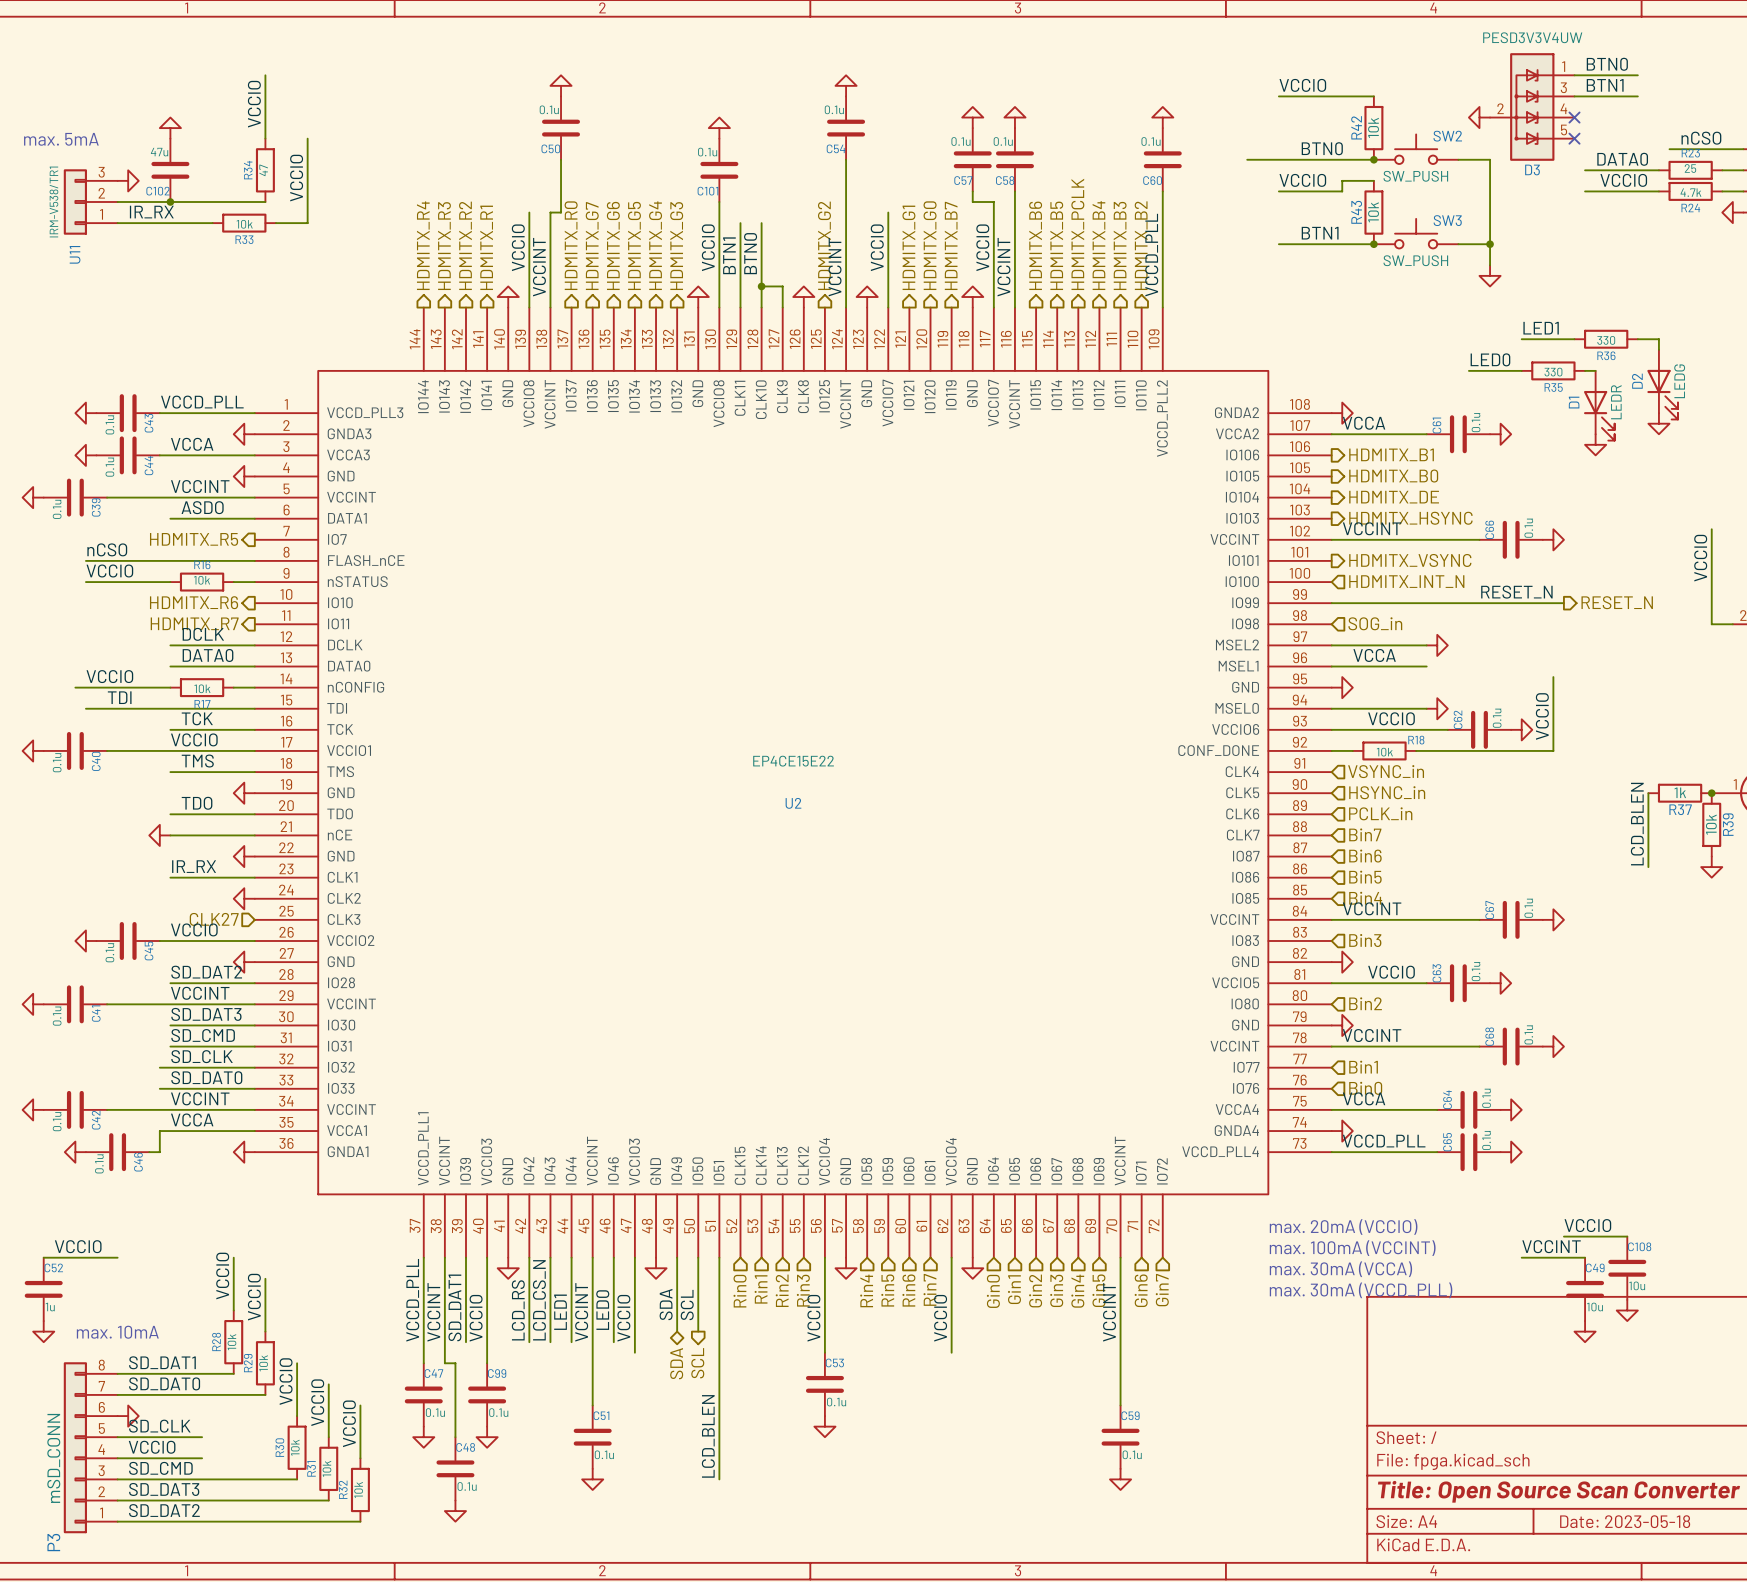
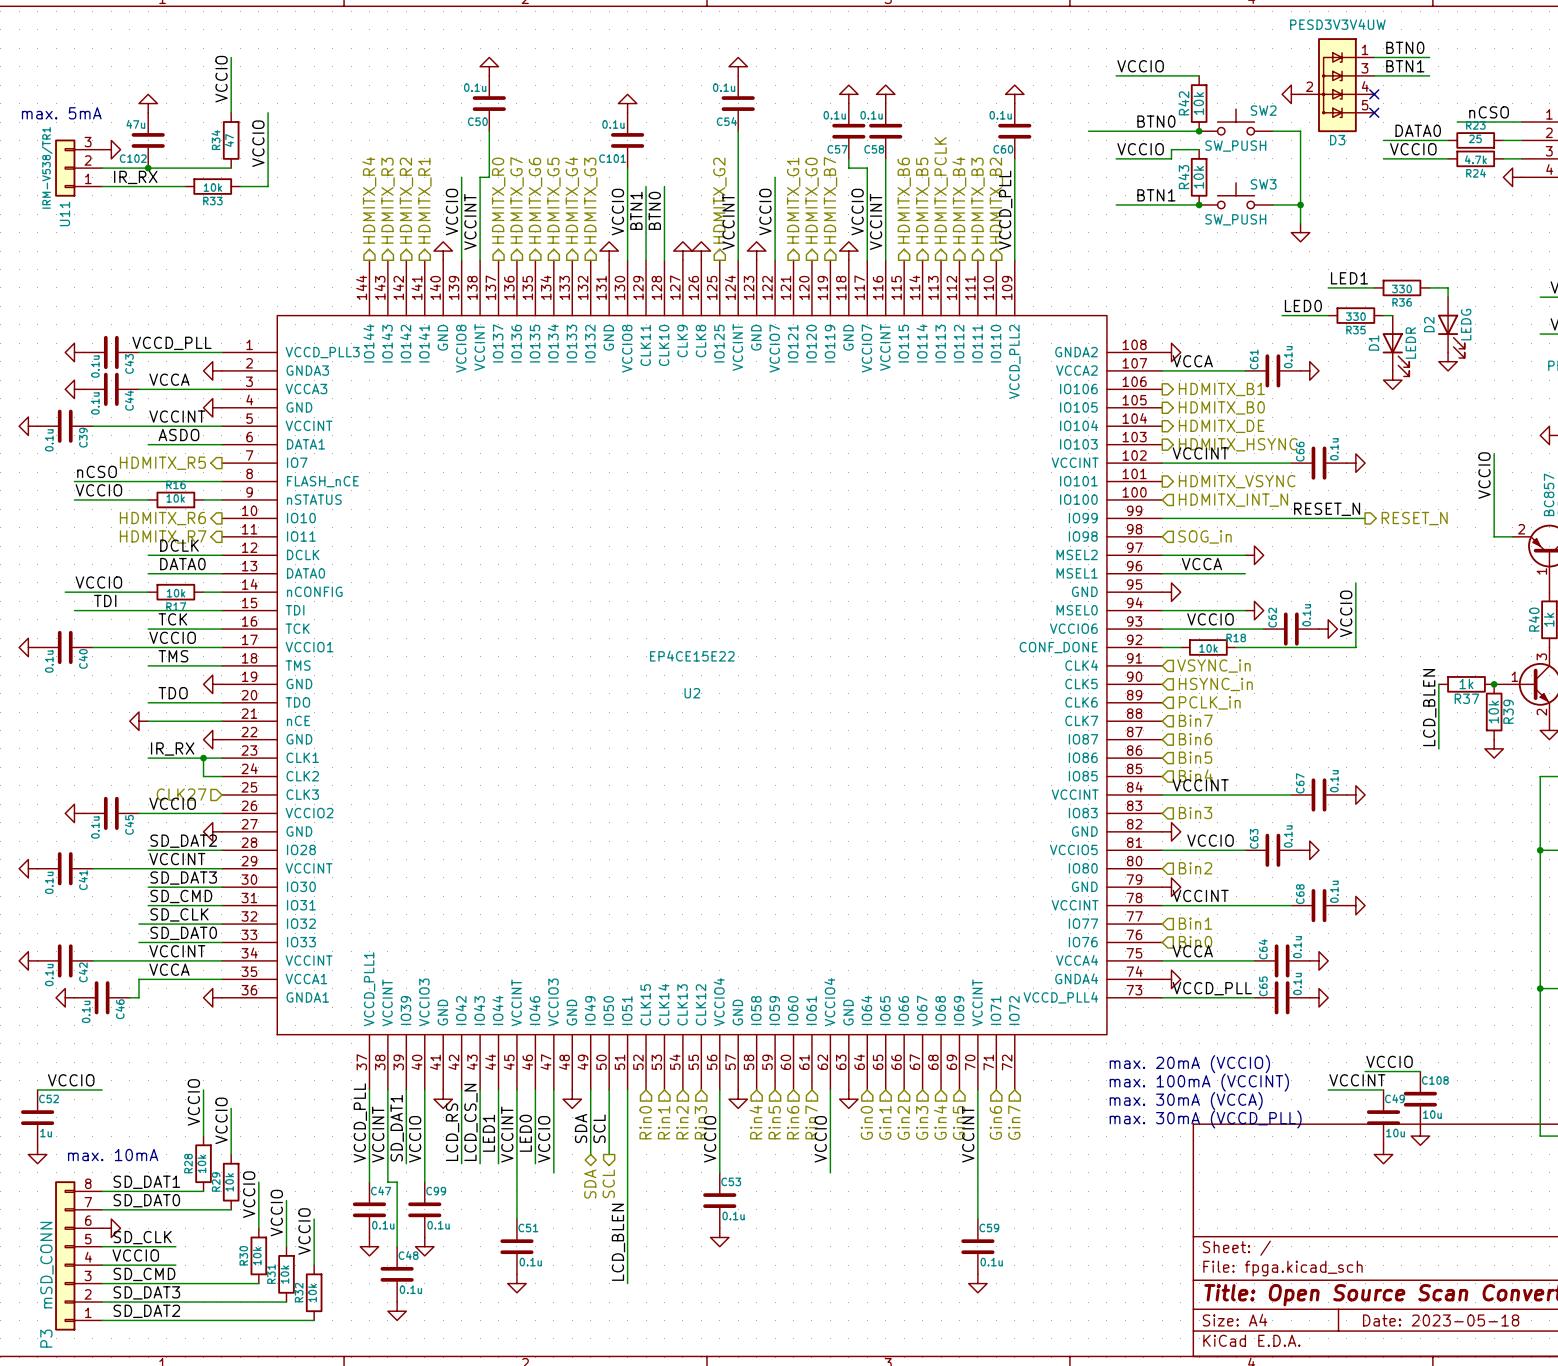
wire: (761, 286) (782, 286) (782, 307) -> none
junction: (761, 286) -> none
power symbol: none -> (682, 251)
wire: none -> (203, 758) (203, 776) (221, 776)
junction: none -> (203, 758)
power symbol: (244, 898) -> none

